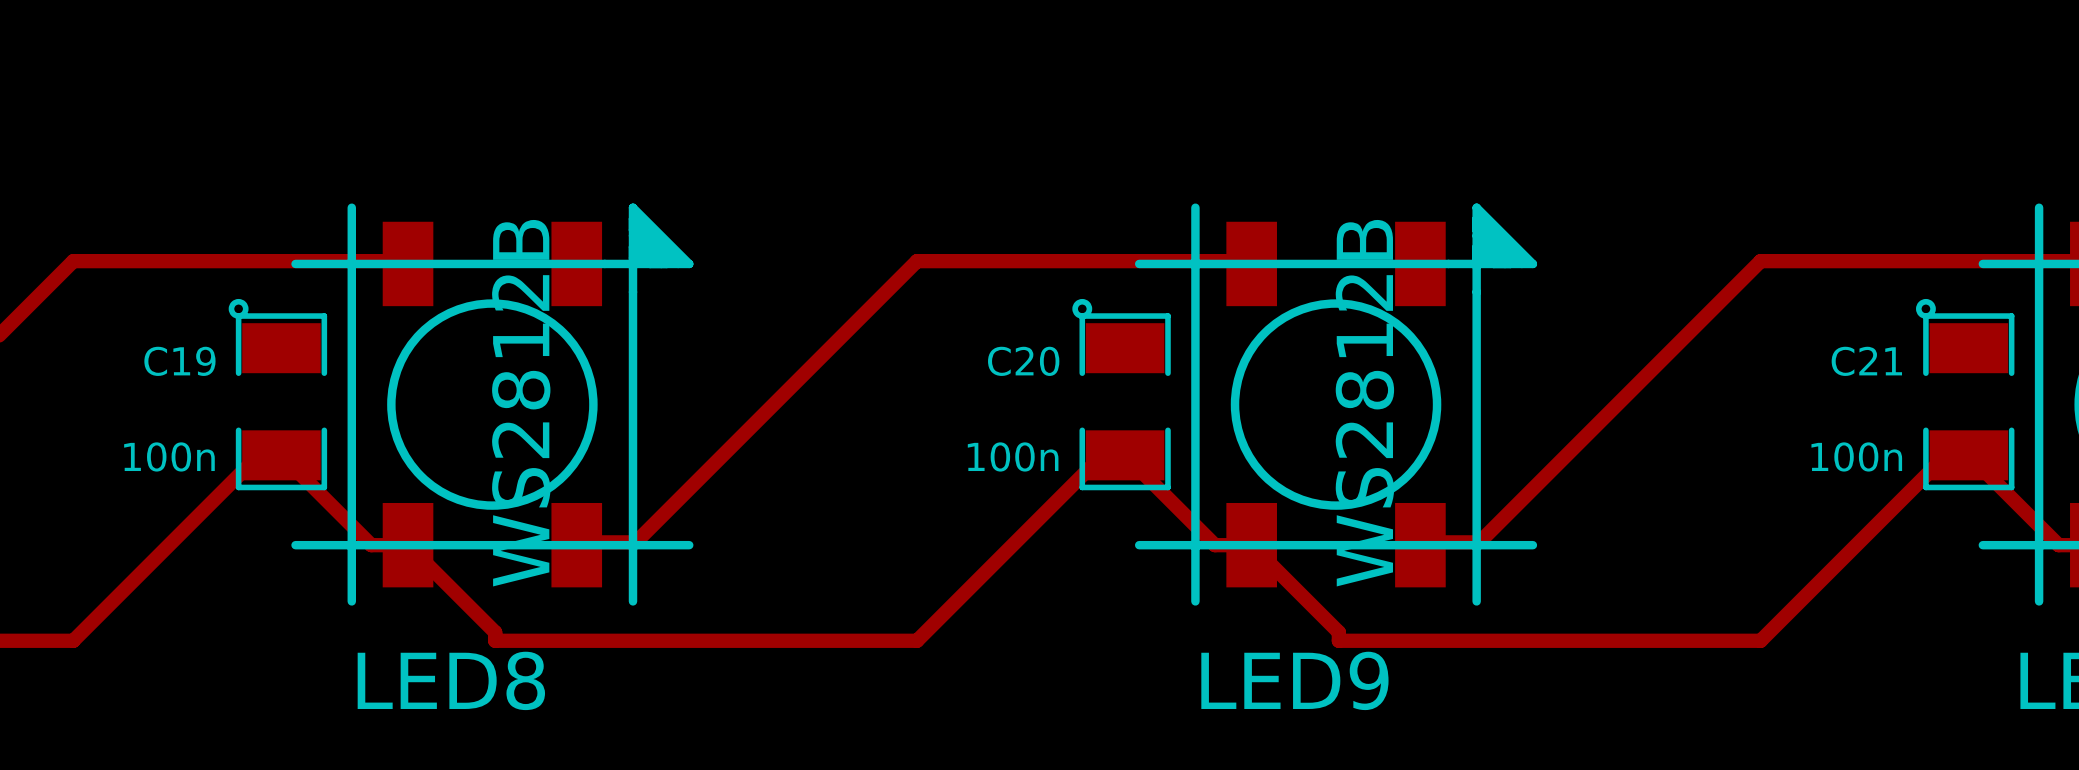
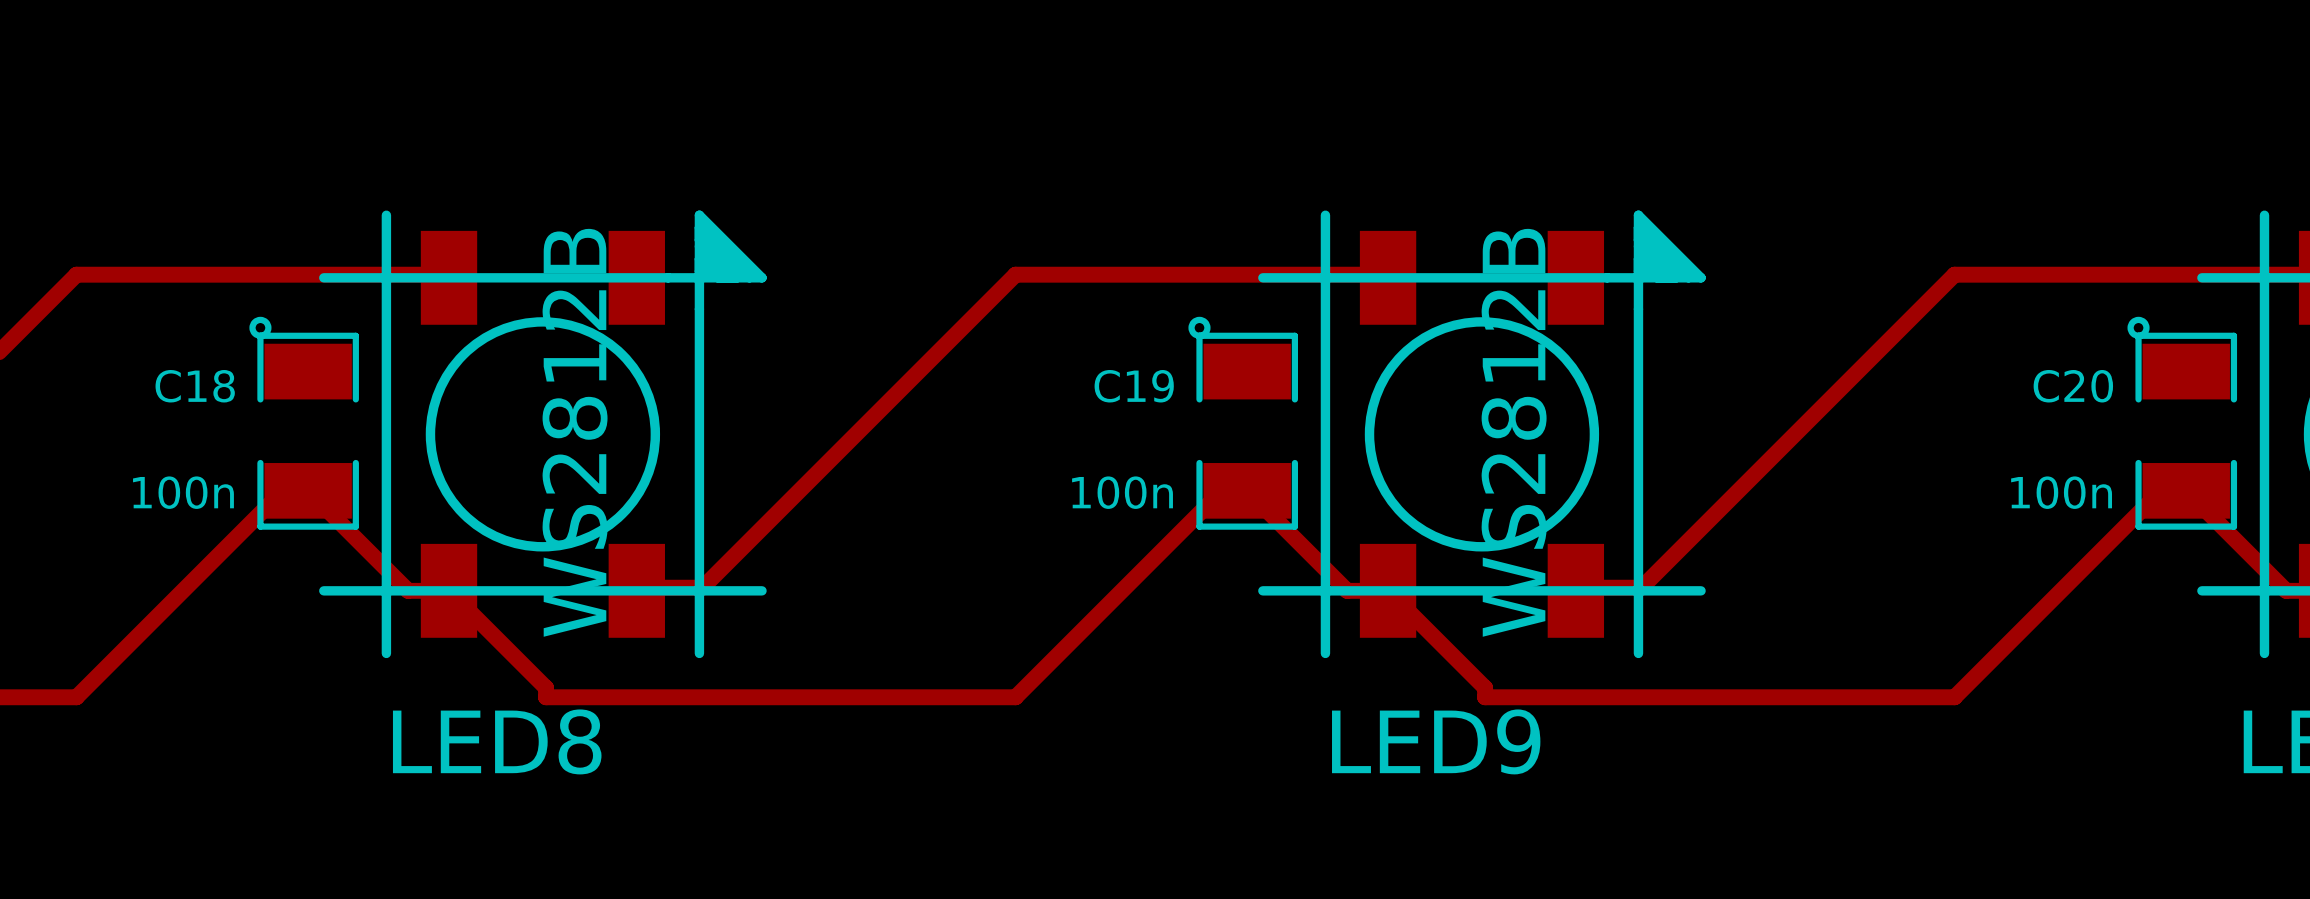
C19 name: C19 (179, 361) -> C18 (195, 386)
C20 name: C20 (1023, 361) -> C19 (1134, 386)
C21 name: C21 (1866, 361) -> C20 (2073, 386)

